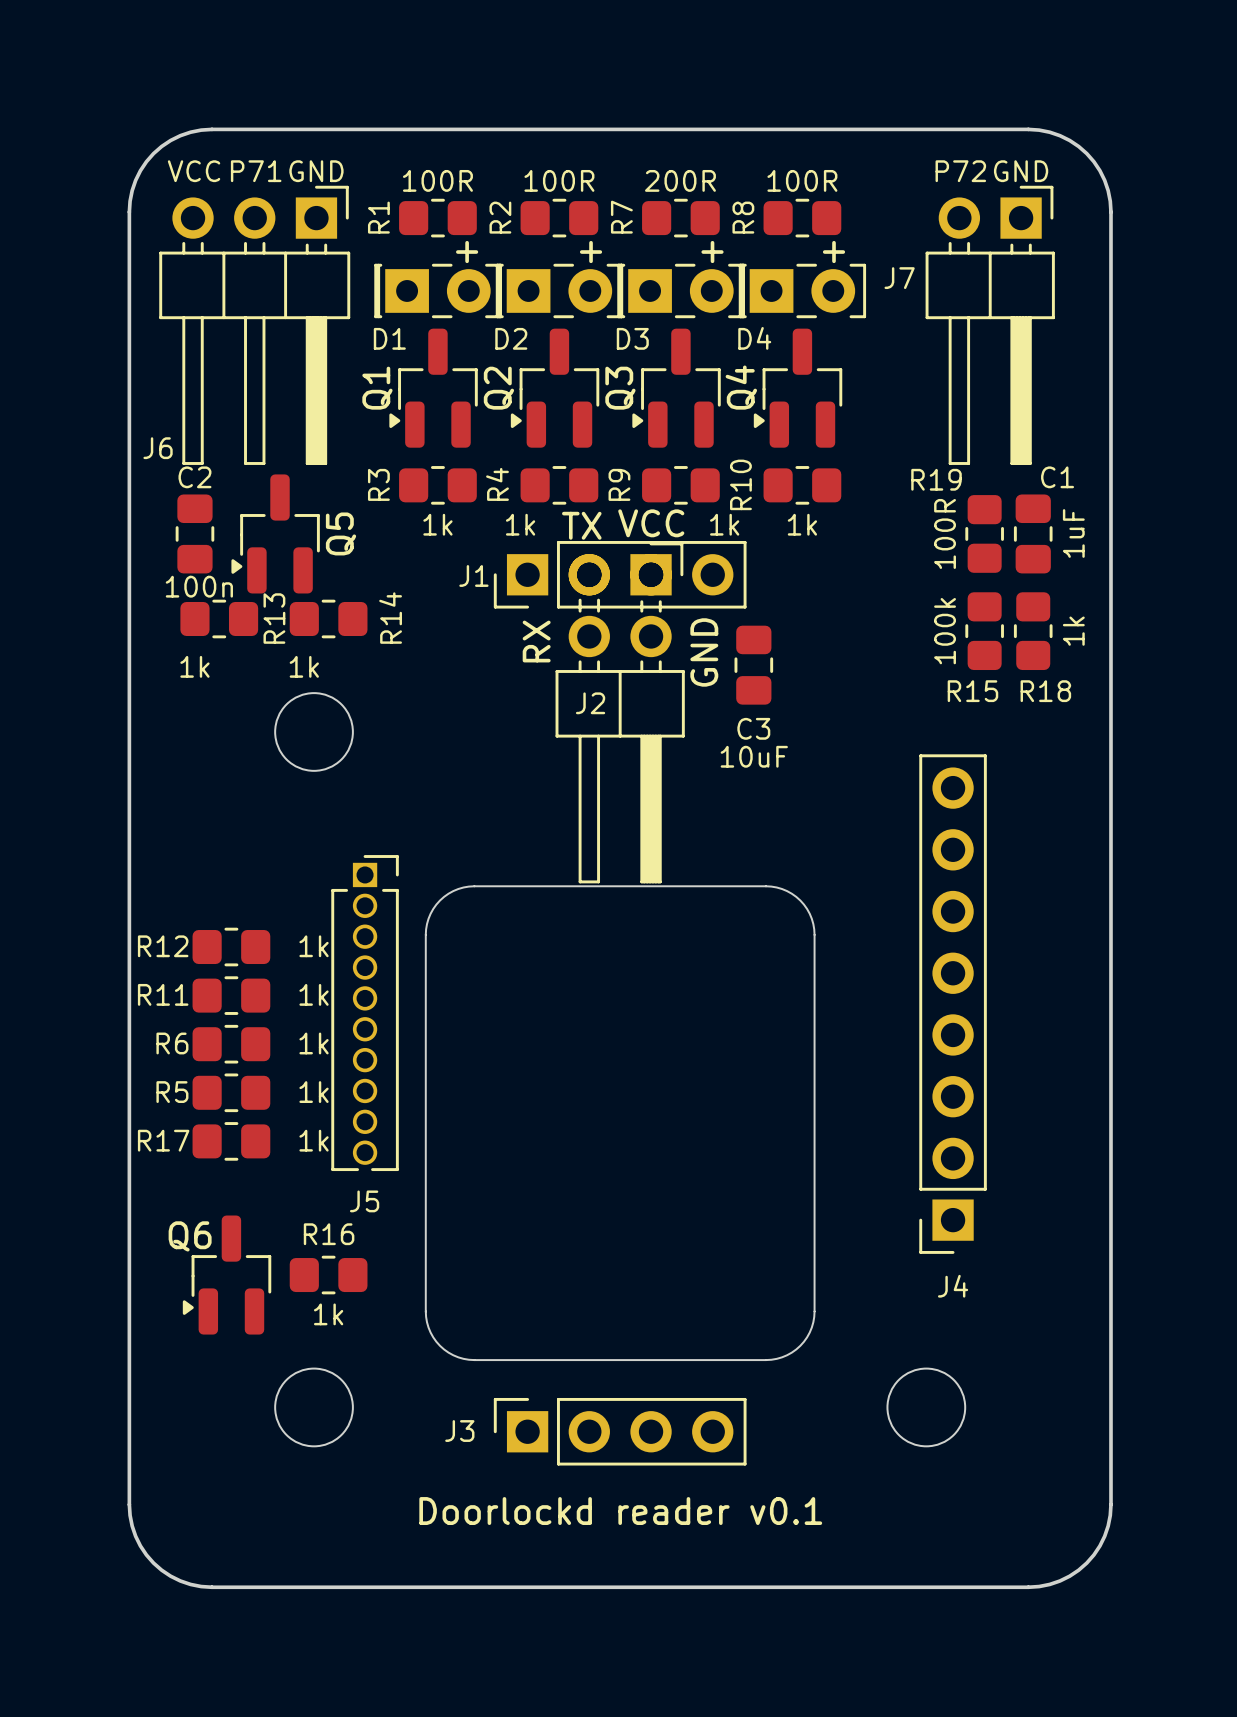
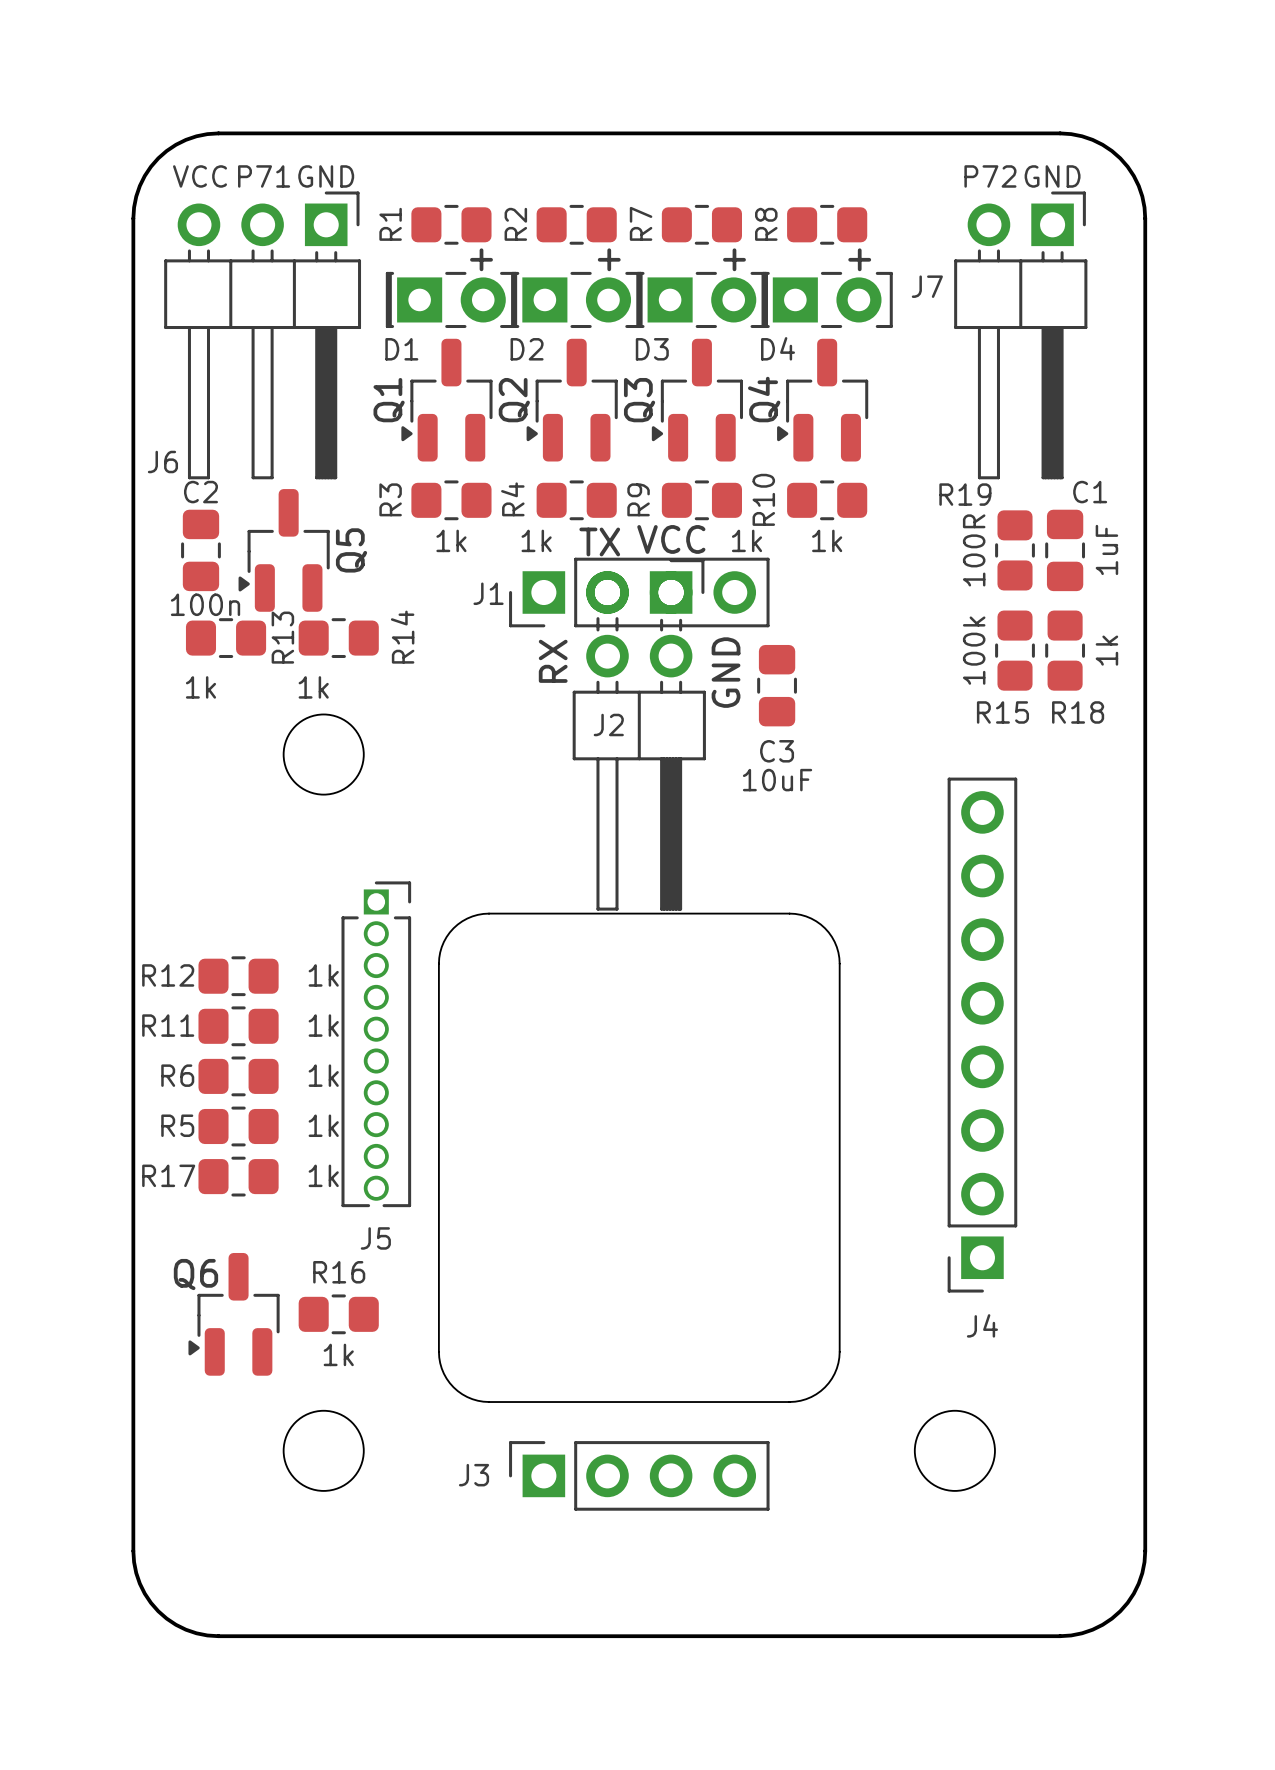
R1 value: 100R (437, 180) -> none
R2 value: 100R (559, 180) -> none
R7 value: 200R (680, 180) -> none
R8 value: 100R (802, 180) -> none
text: Doorlockd reader v0.1 (620, 1511) -> none

